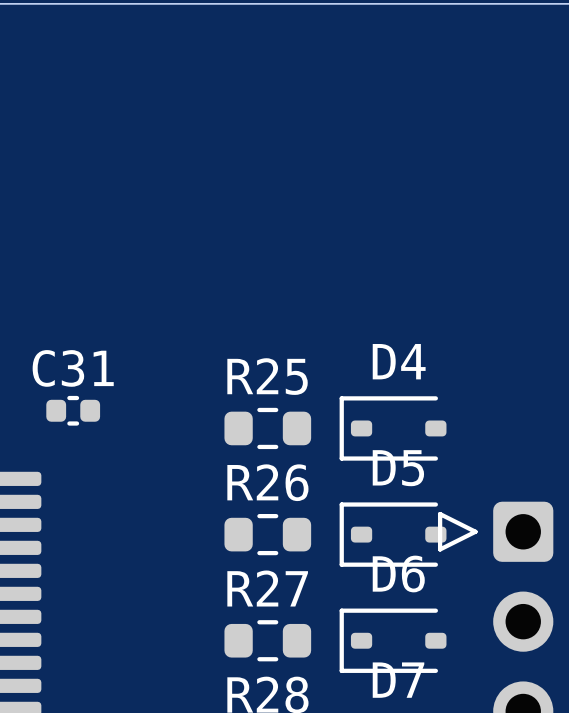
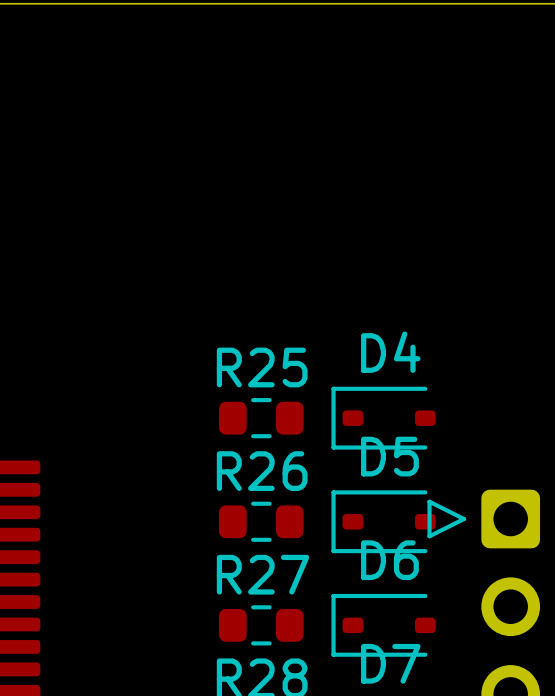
C31: (73, 410) -> none

